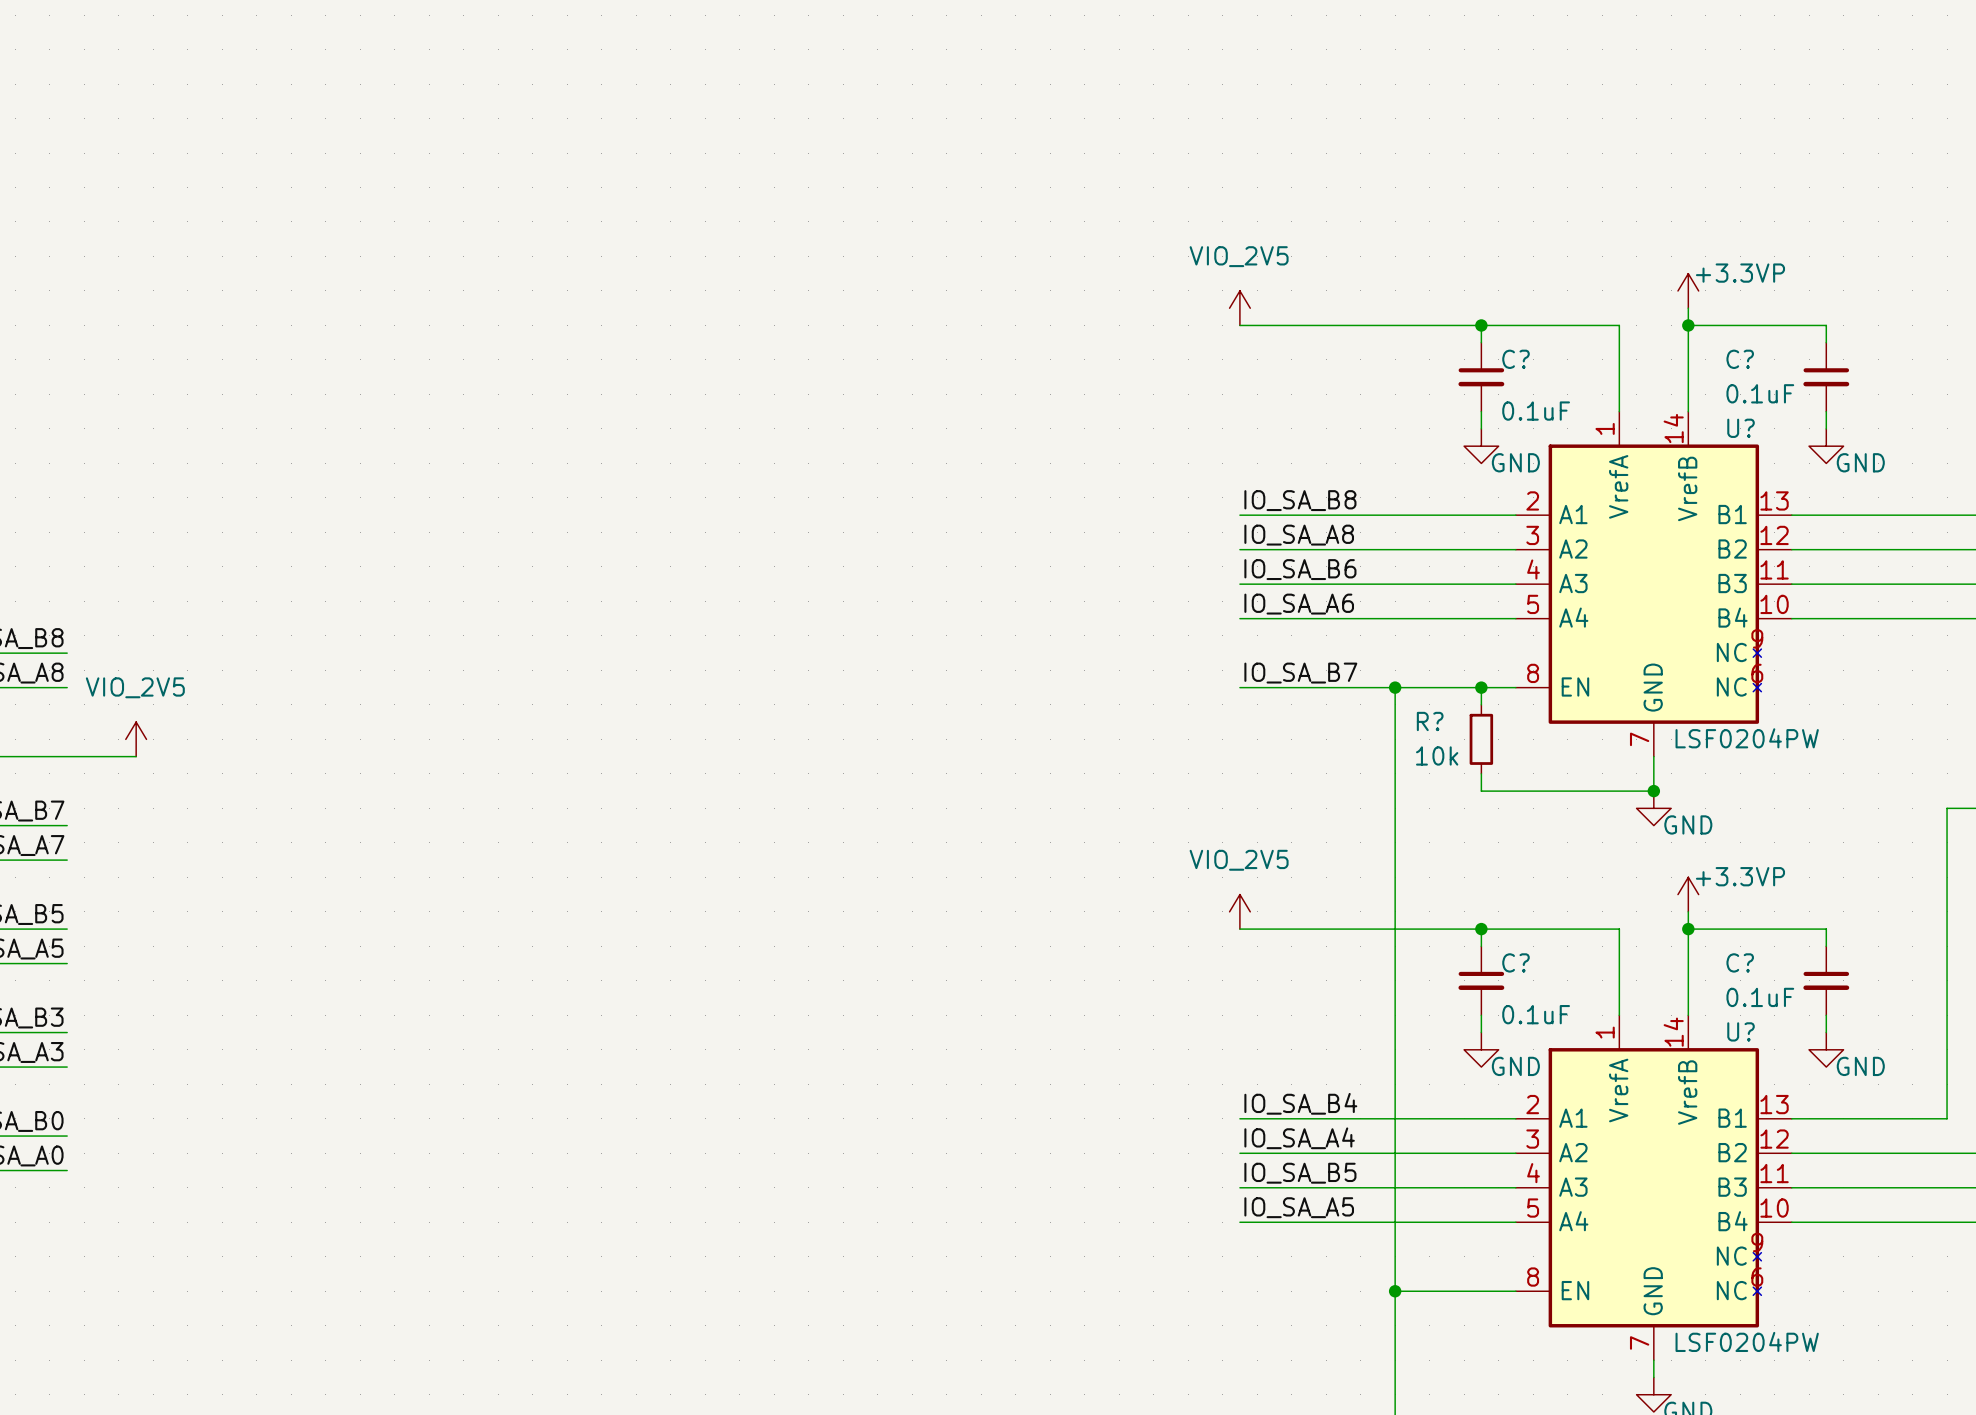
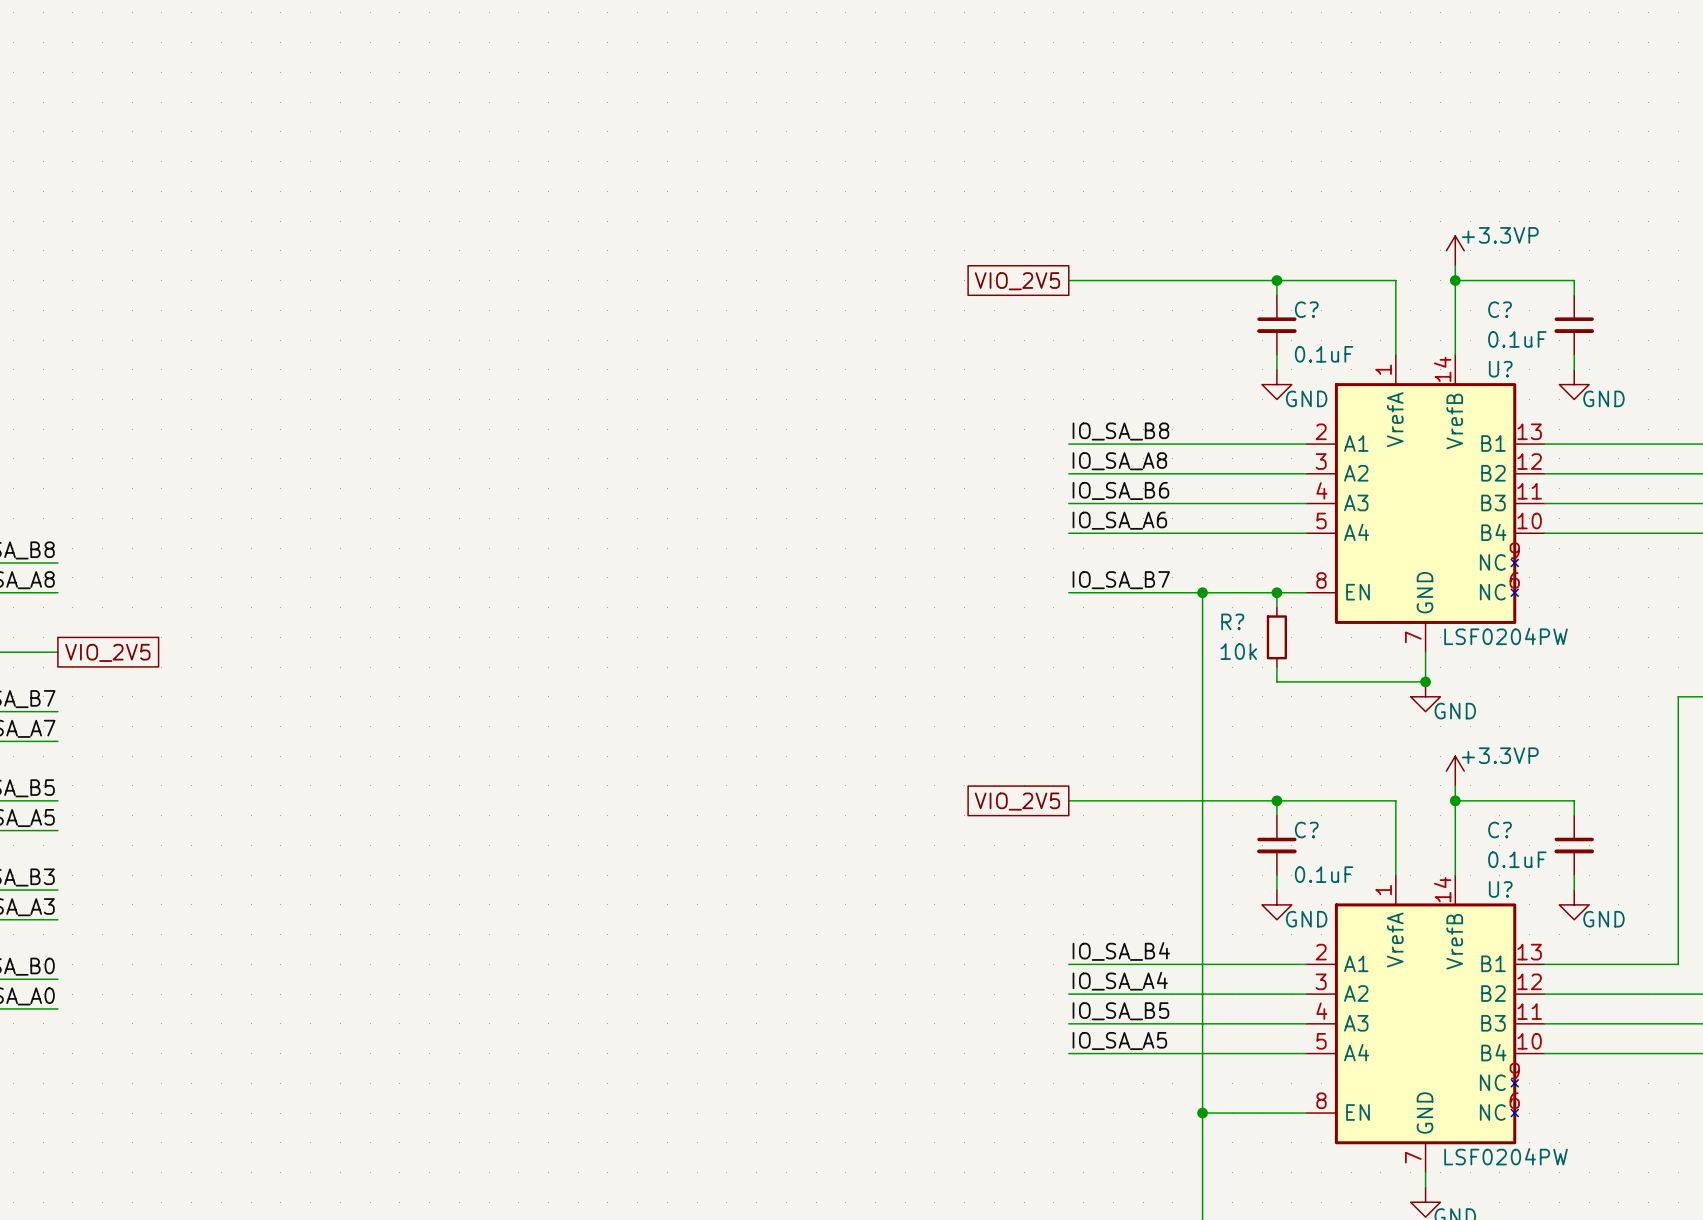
power symbol: VIO_2V5 (1239, 308) -> none
global label: none -> VIO_2V5 (1017, 281)
power symbol: VIO_2V5 (136, 739) -> none
wire: (67, 756) (136, 756) -> none
global label: none -> VIO_2V5 (107, 652)
power symbol: VIO_2V5 (1239, 911) -> none
global label: none -> VIO_2V5 (1017, 801)

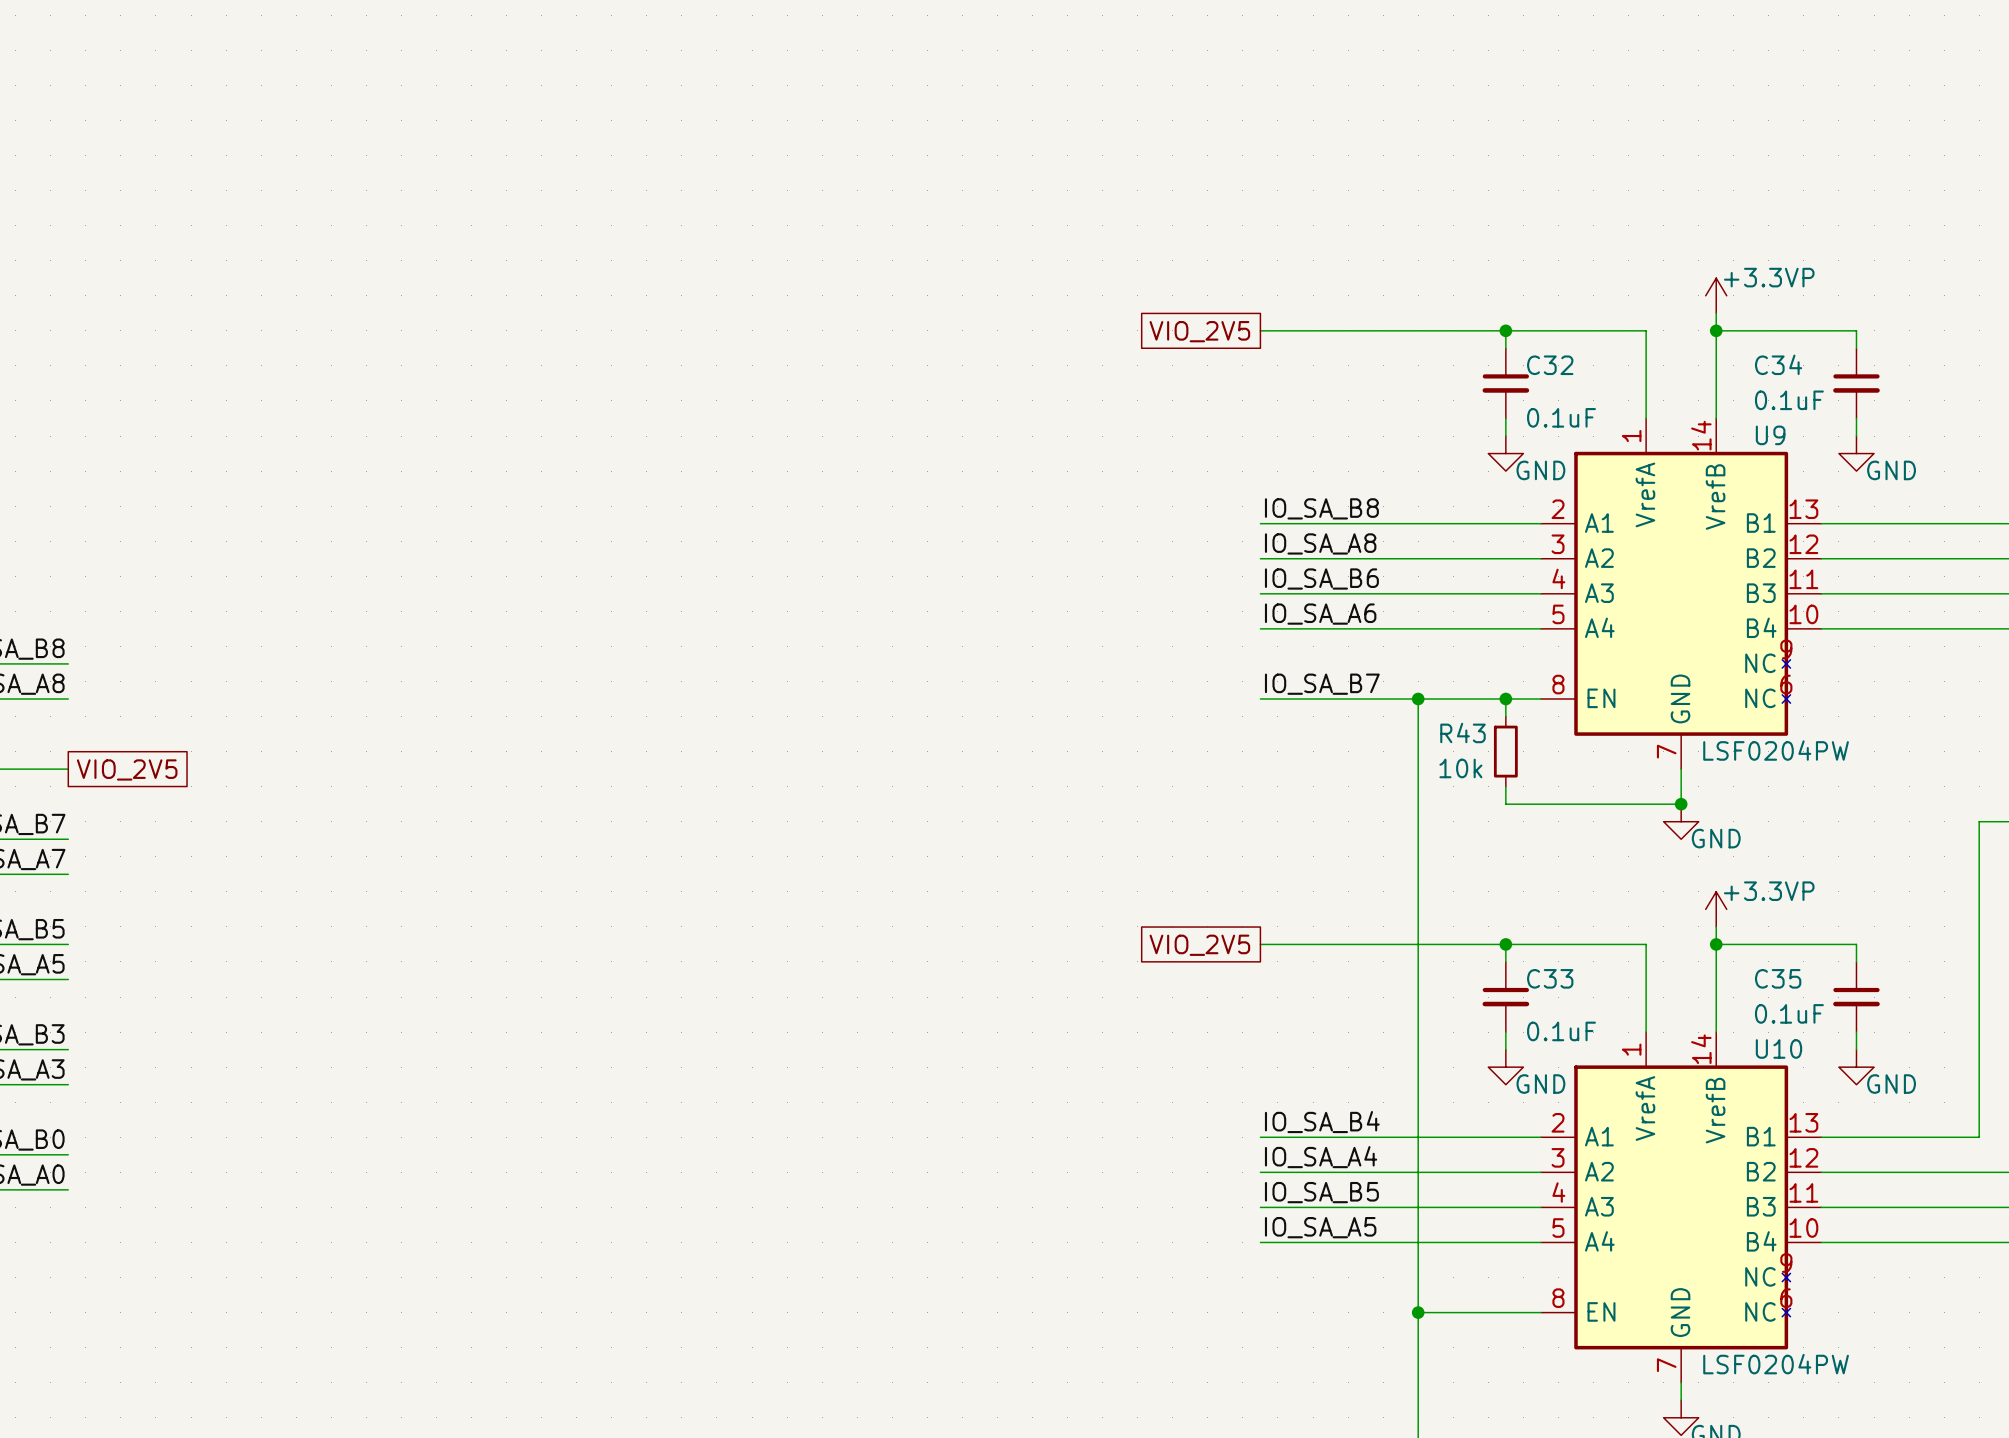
C? name: C? (1306, 309) -> C32 (1550, 365)
C? name: C? (1500, 309) -> C34 (1778, 364)
U? name: U? (1500, 369) -> U9 (1770, 435)
R? name: R? (1232, 621) -> R43 (1462, 732)
C? name: C? (1306, 830) -> C33 (1550, 978)
C? name: C? (1500, 830) -> C35 (1778, 978)
U? name: U? (1500, 889) -> U10 (1778, 1048)

